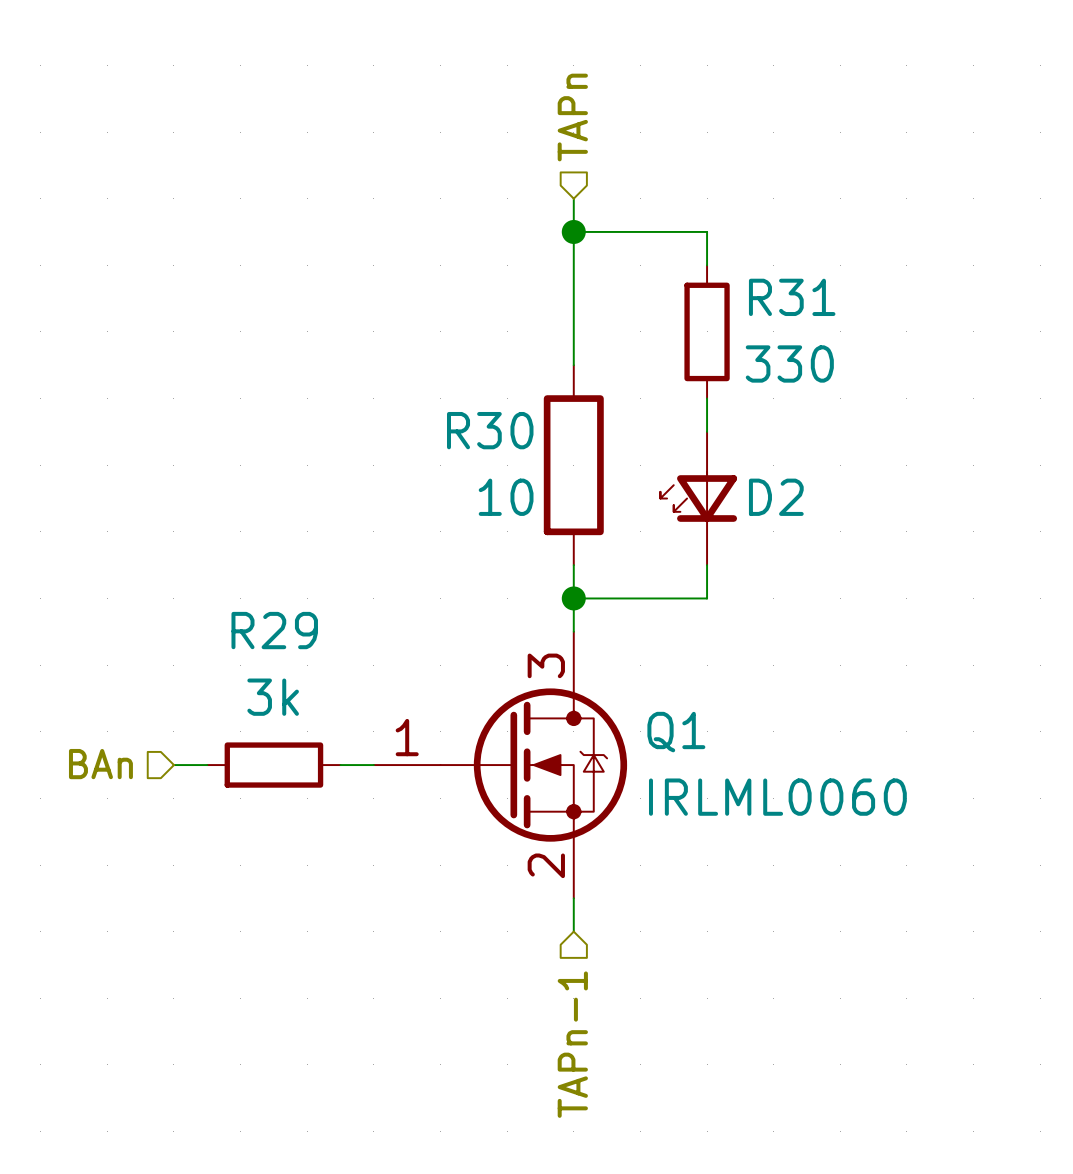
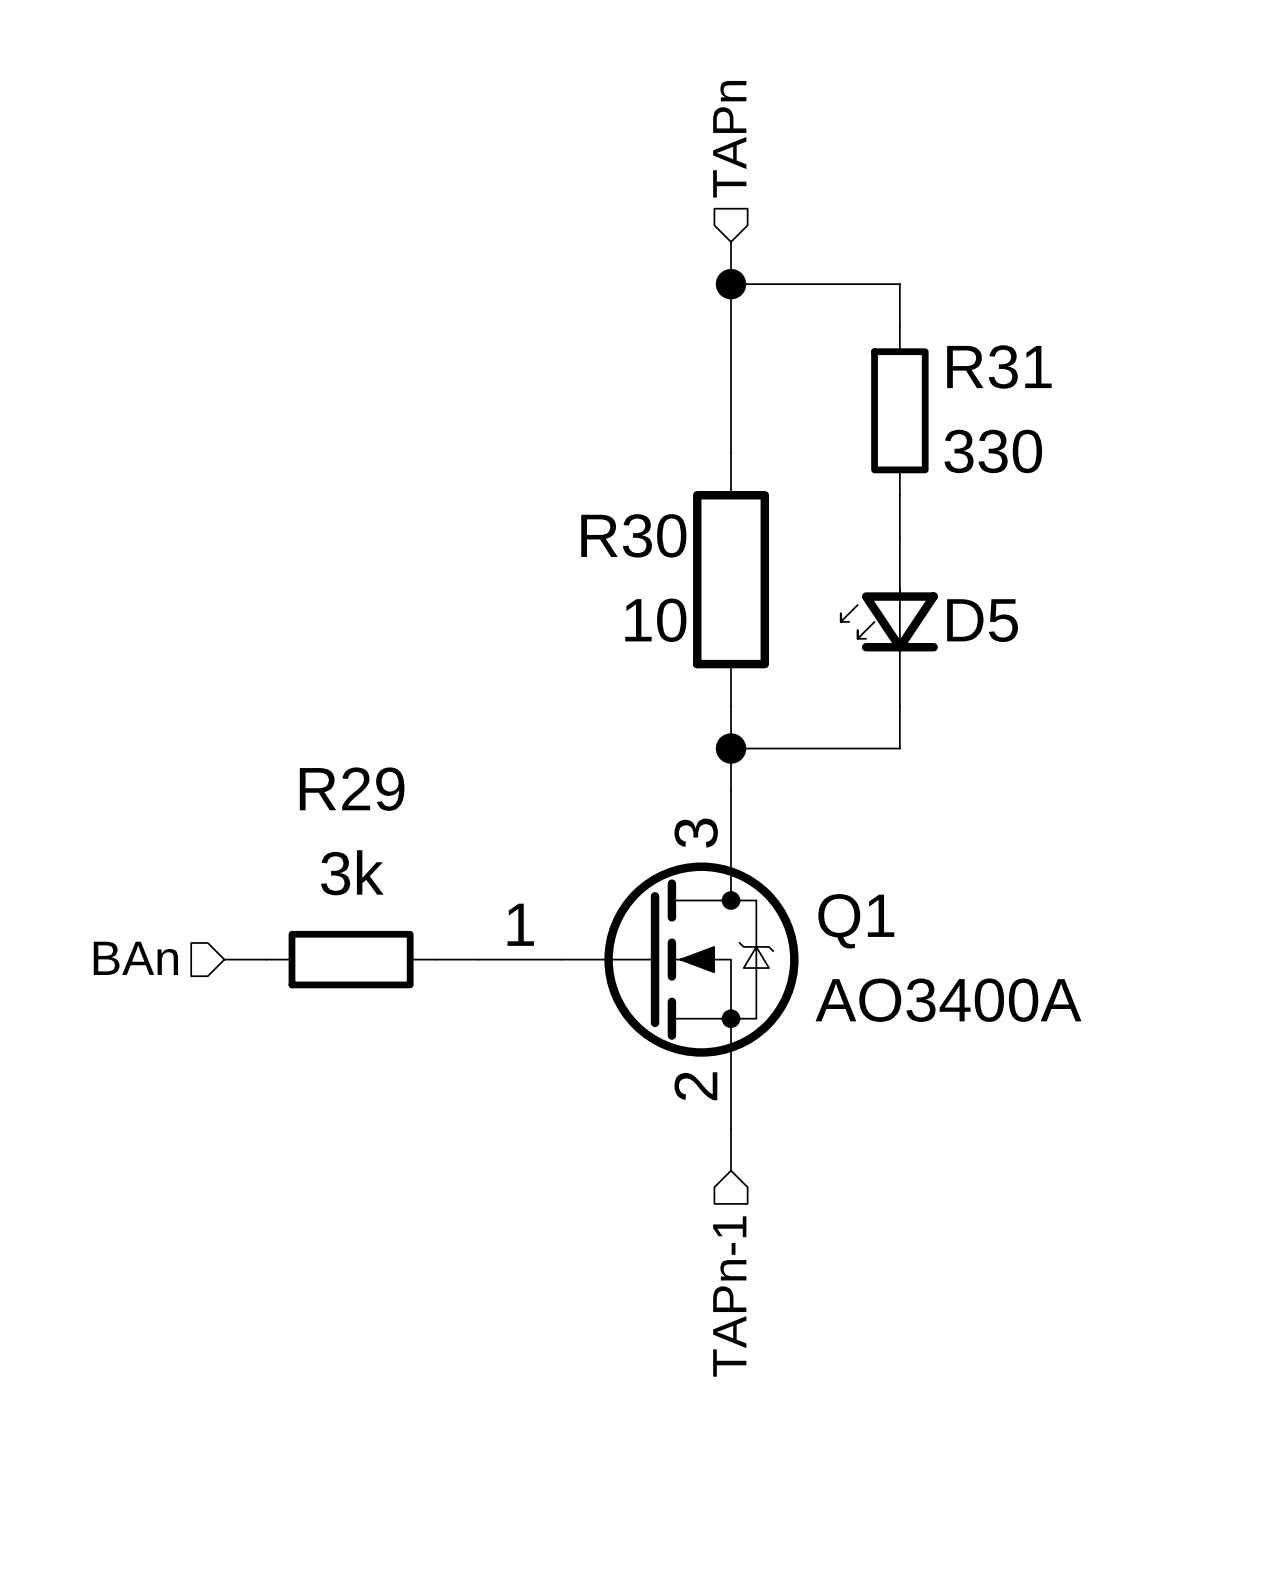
D2 name: D2 (776, 497) -> D5 (982, 620)
Q1 value: IRLML0060 (777, 797) -> AO3400A (948, 1000)

